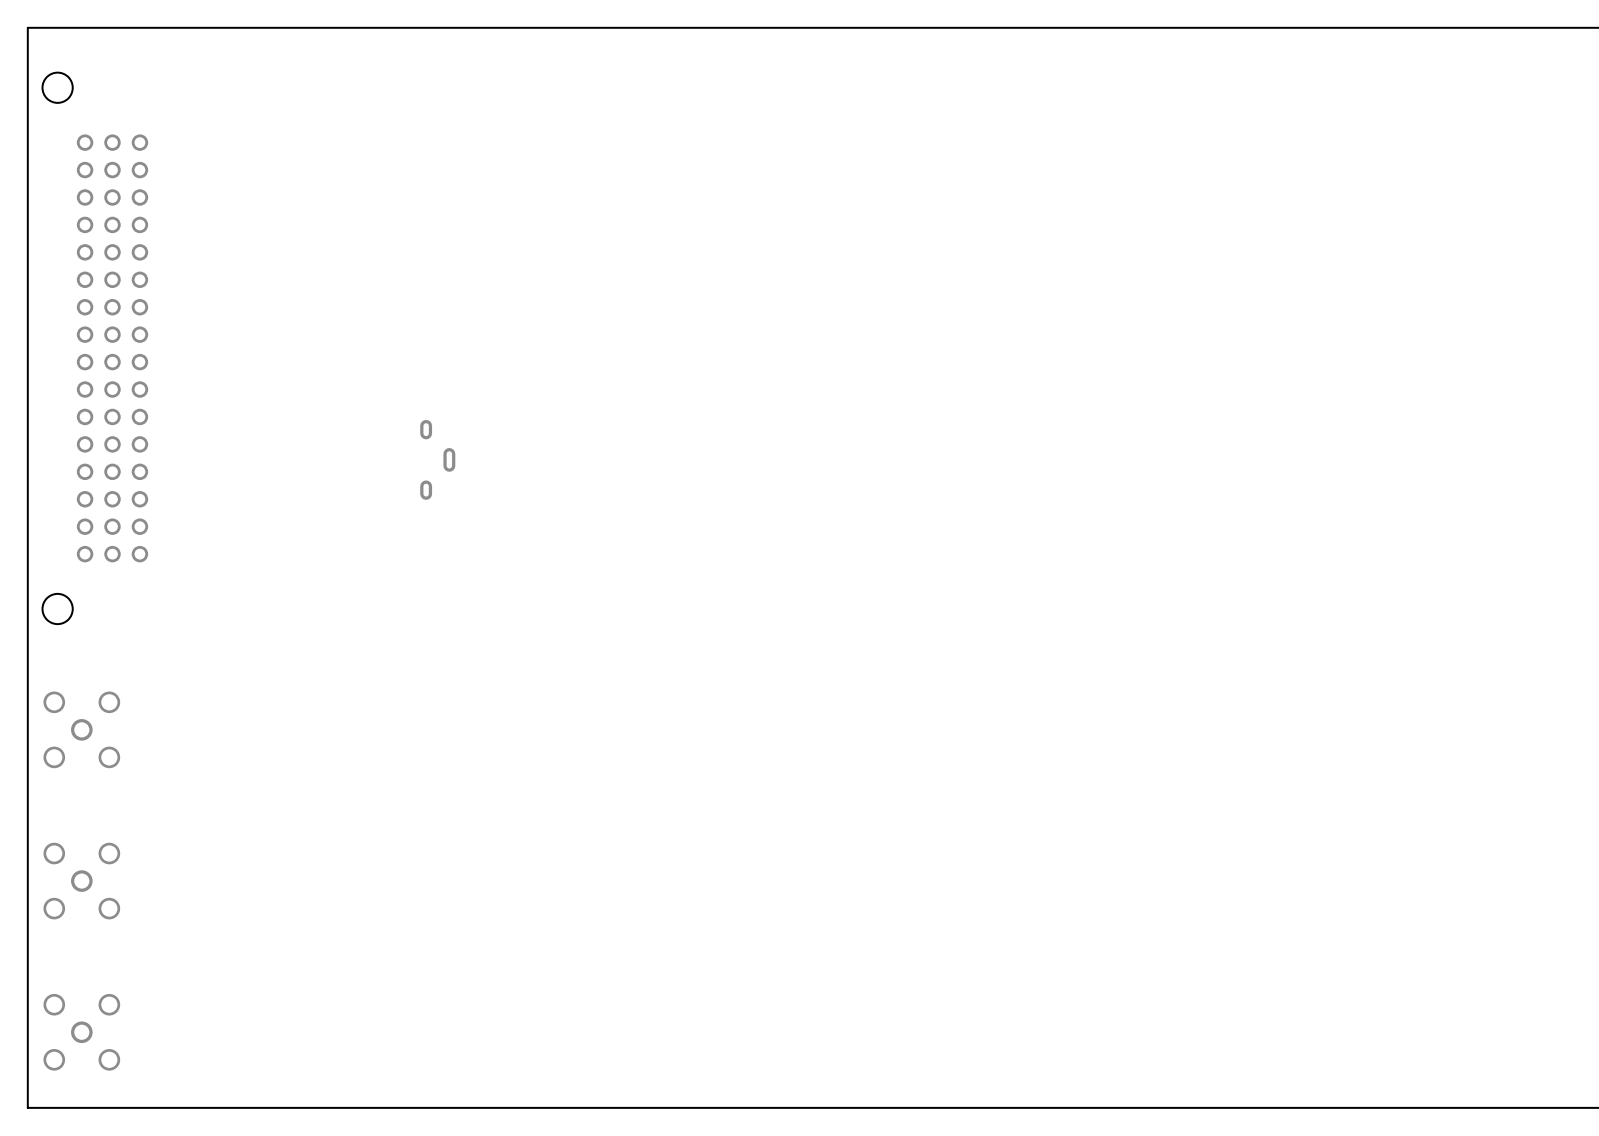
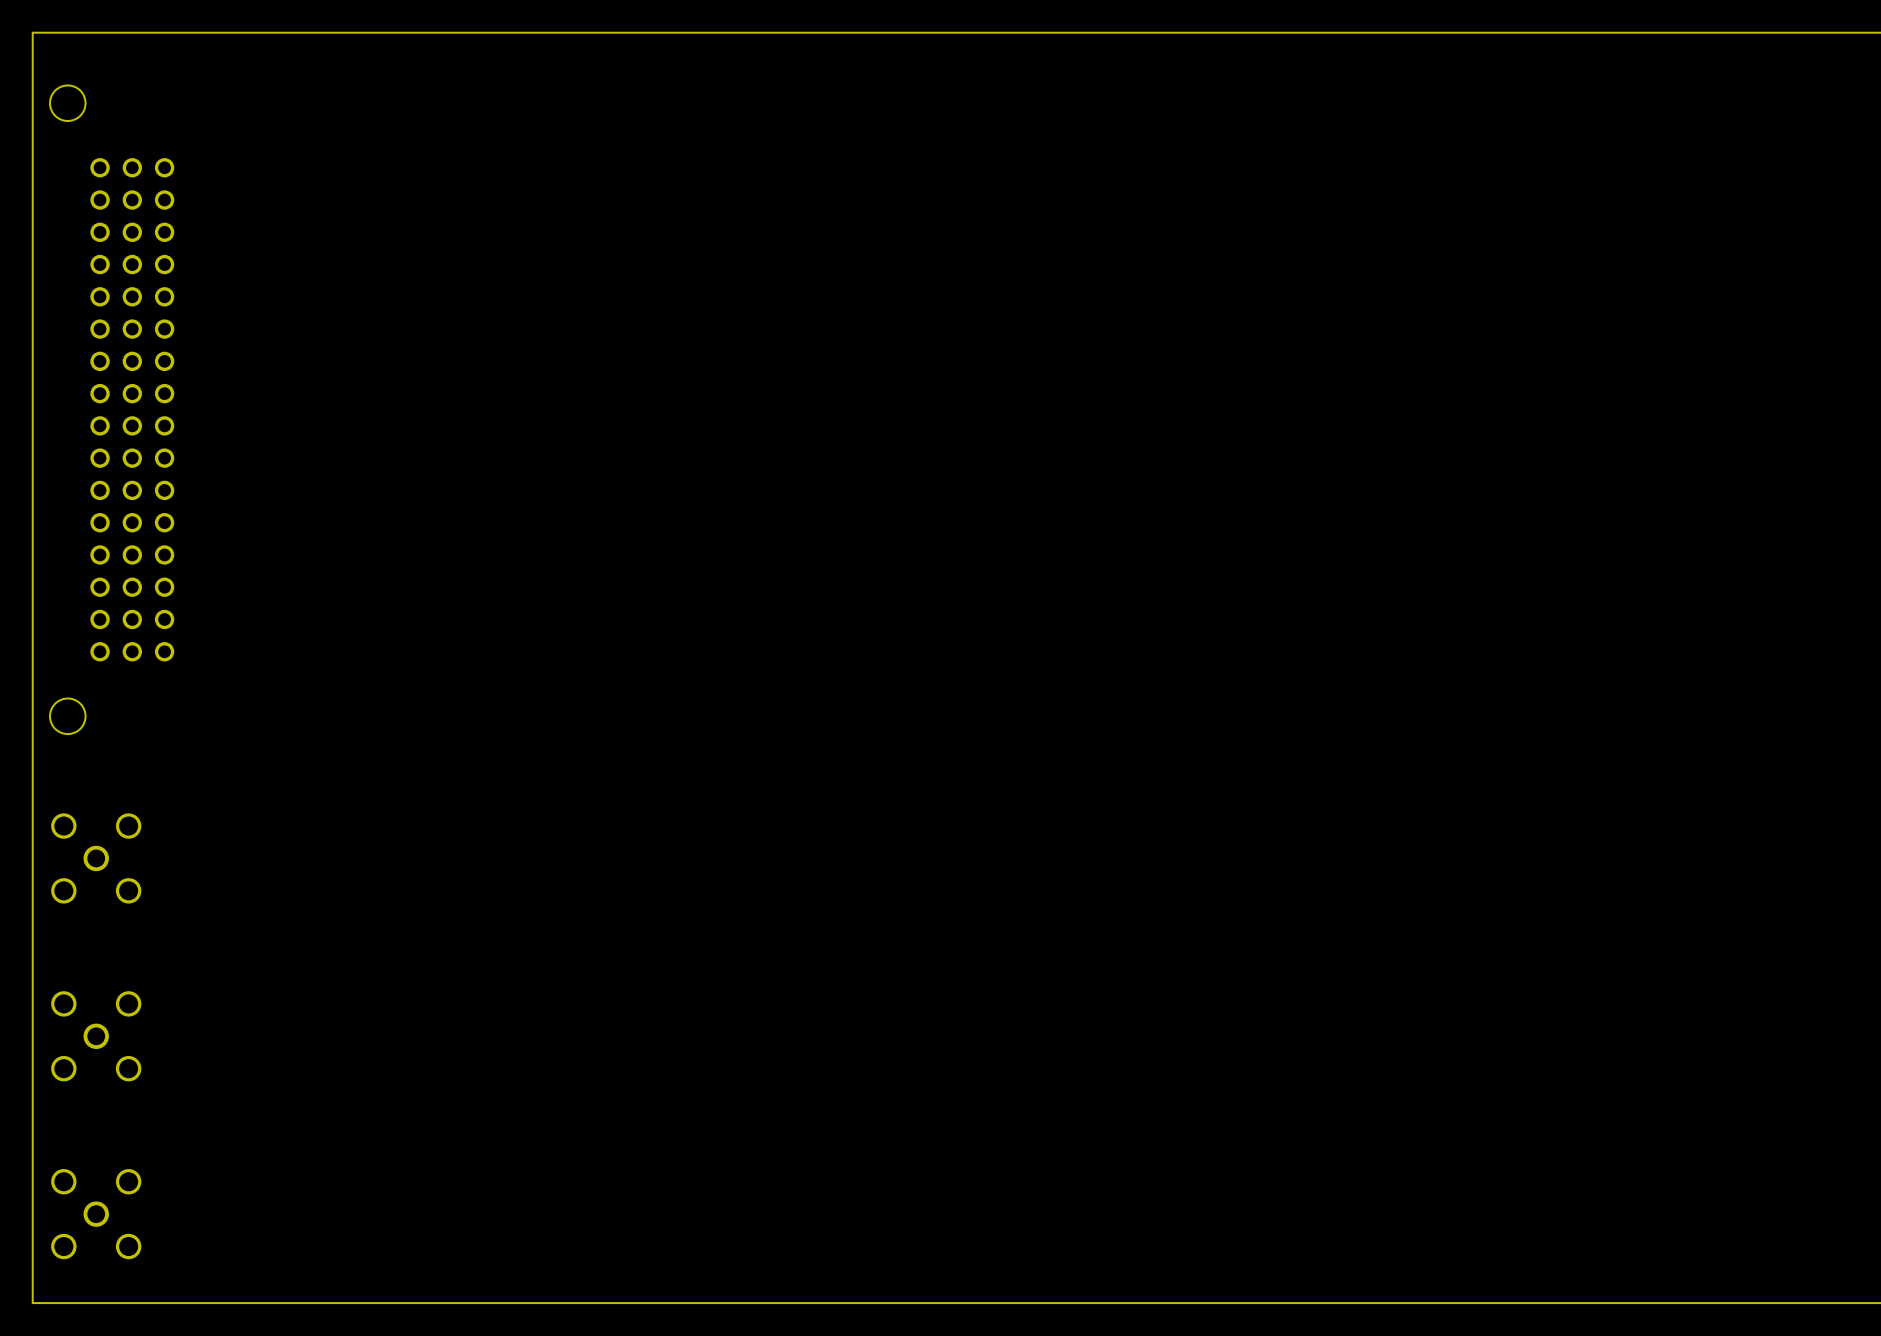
part: (437, 459) -> none

